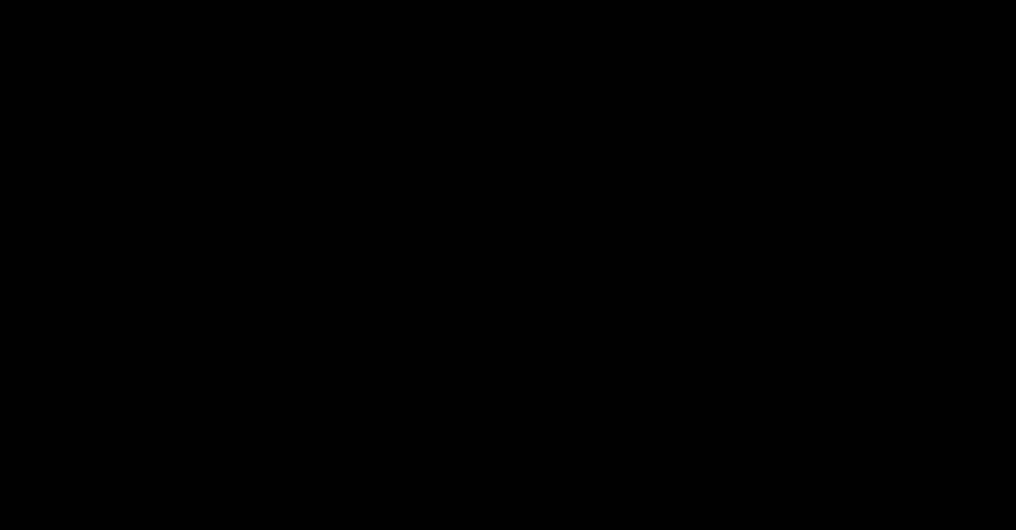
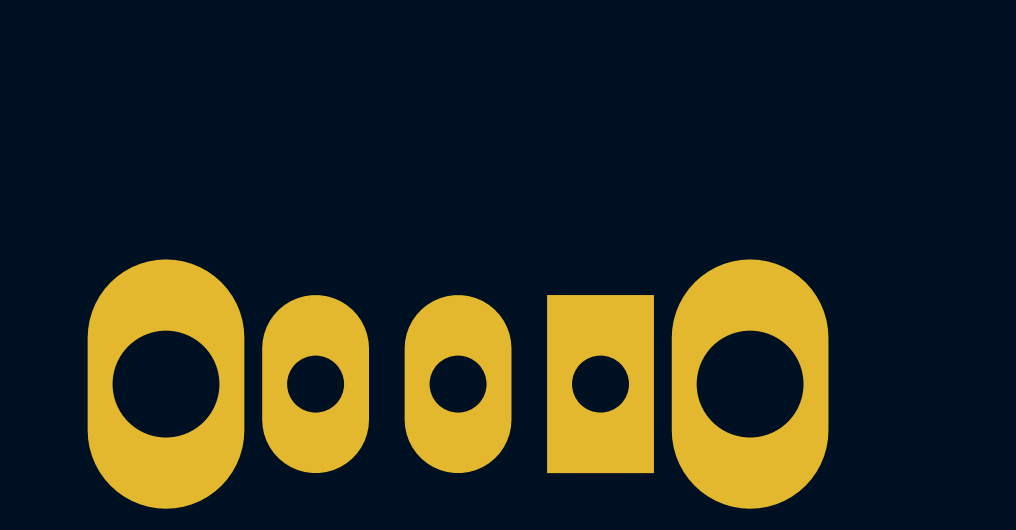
part: none -> (458, 384)

